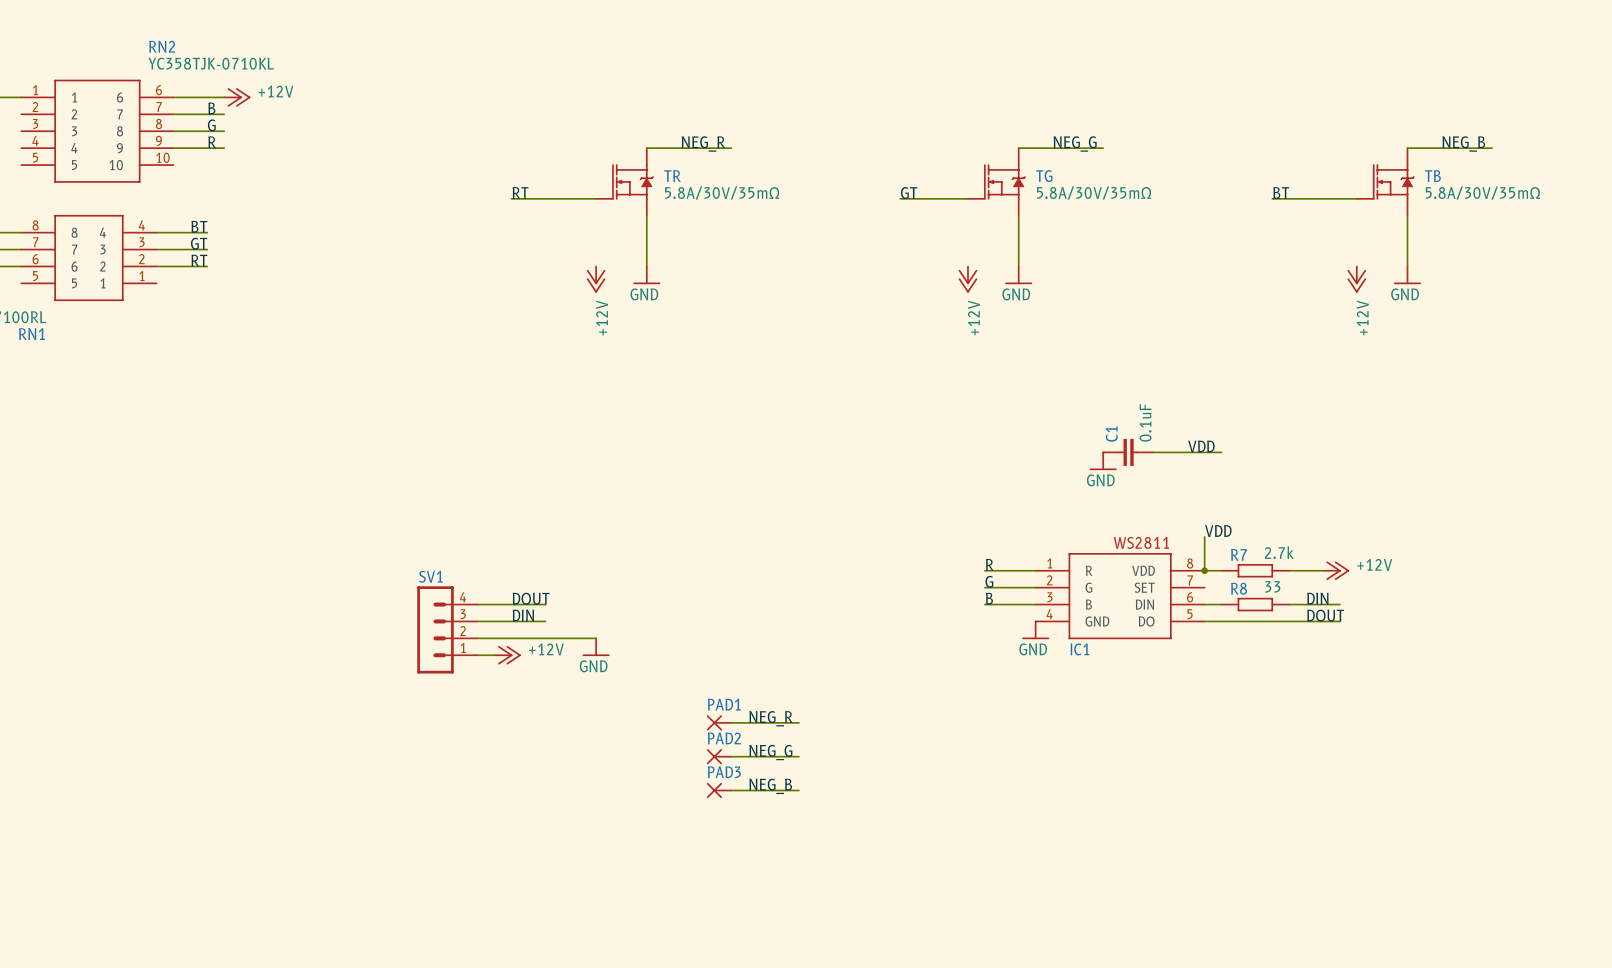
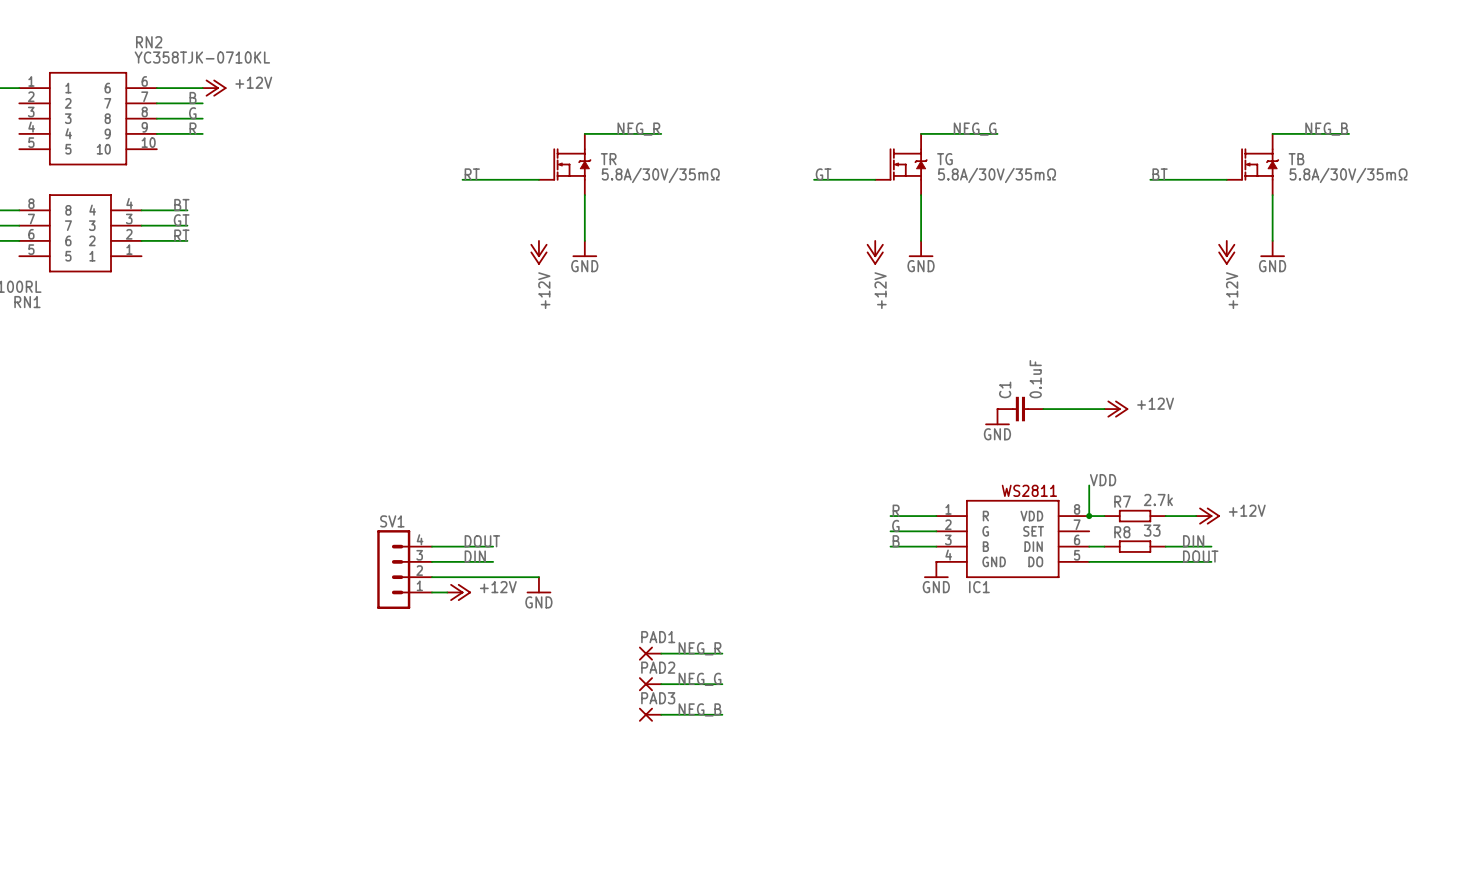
label: VDD (1201, 446) -> none
power symbol: none -> +12V (1116, 409)

